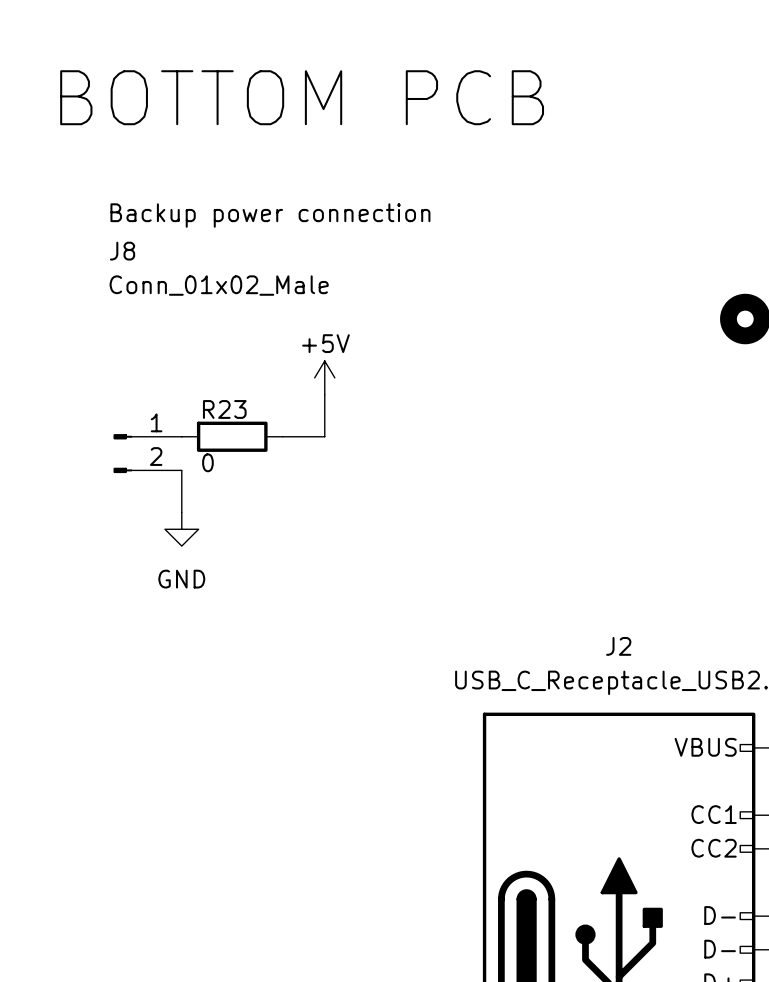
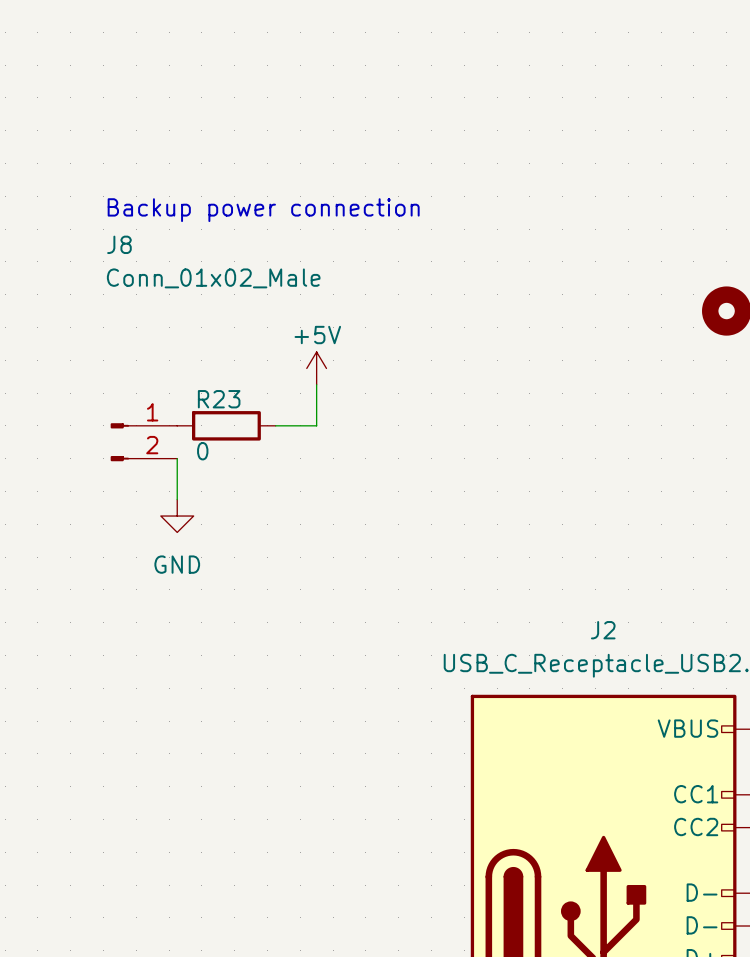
text: BOTTOM PCB (302, 97) -> none

